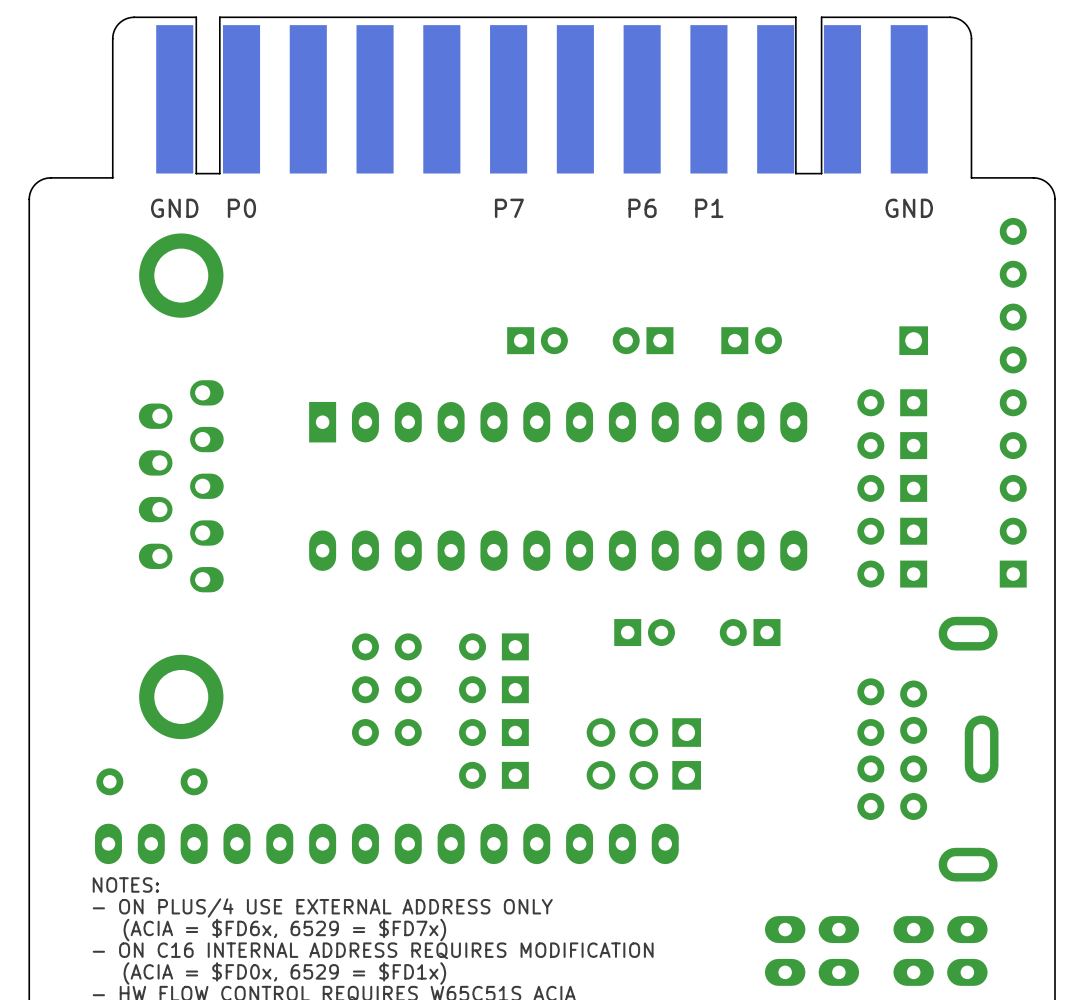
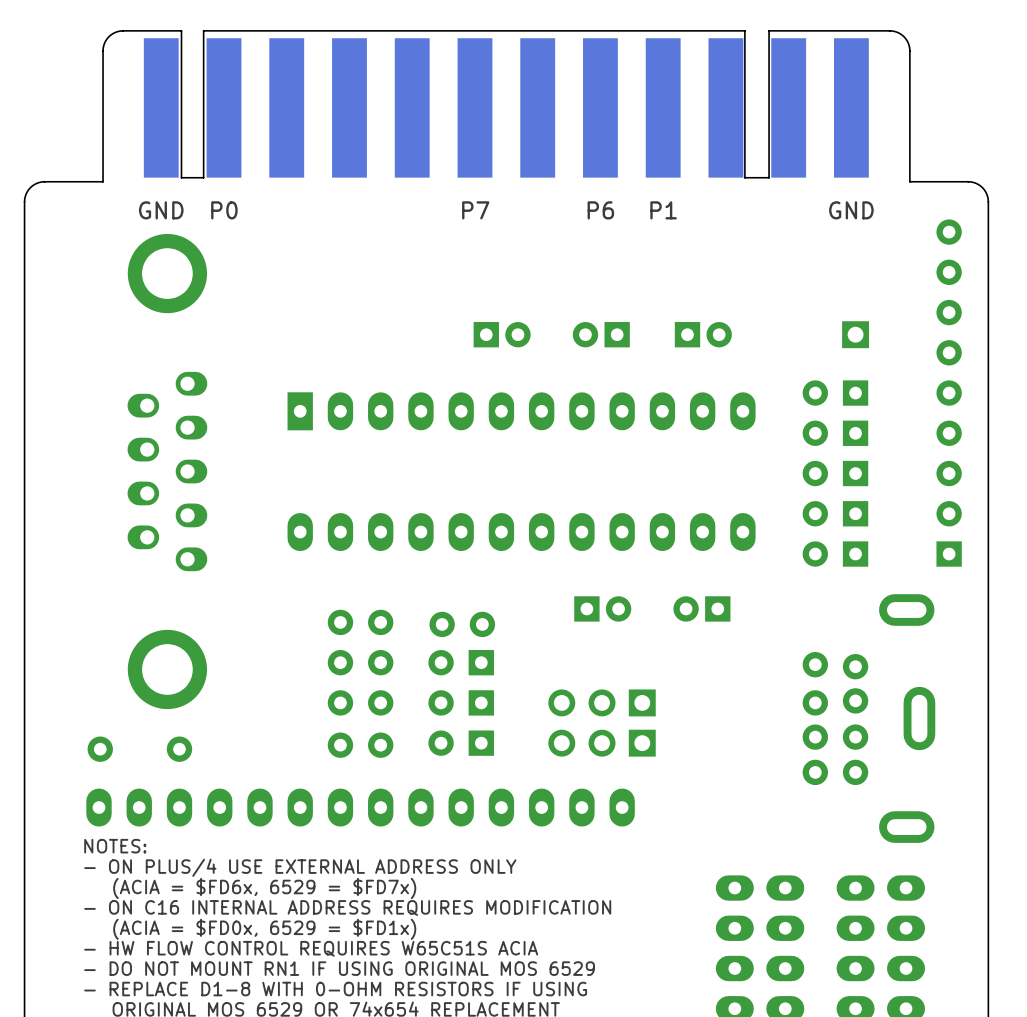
part footprint: [459, 633, 529, 661] -> [429, 611, 496, 638]
part: none -> (360, 745)

